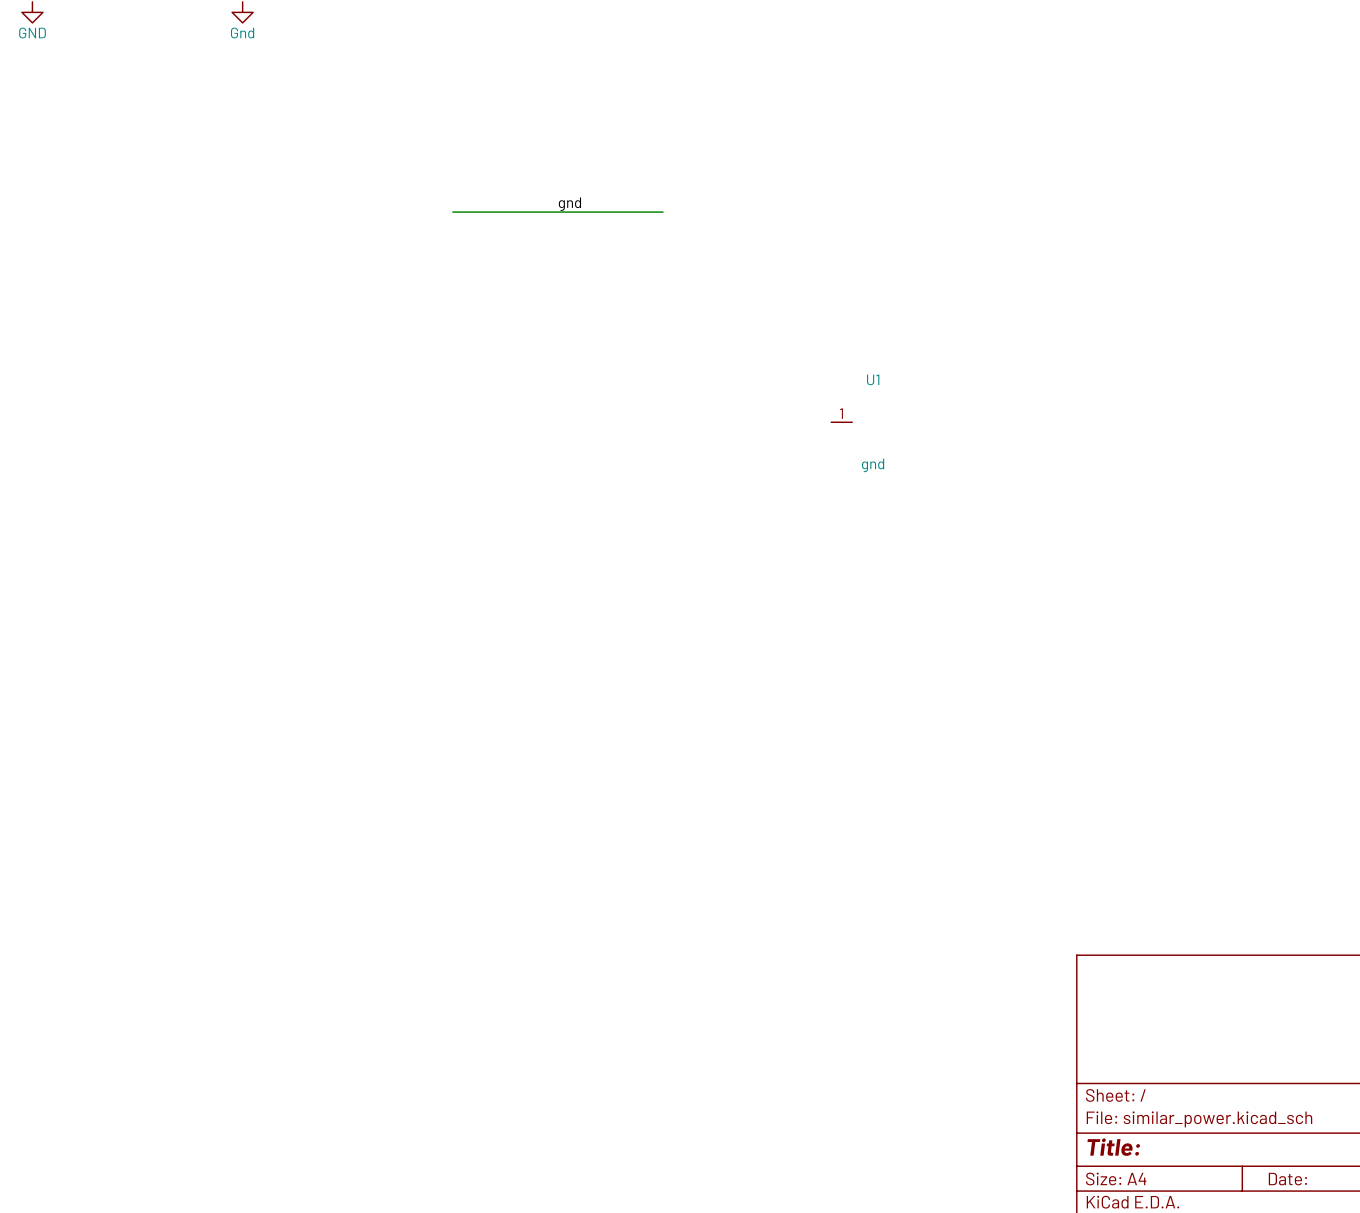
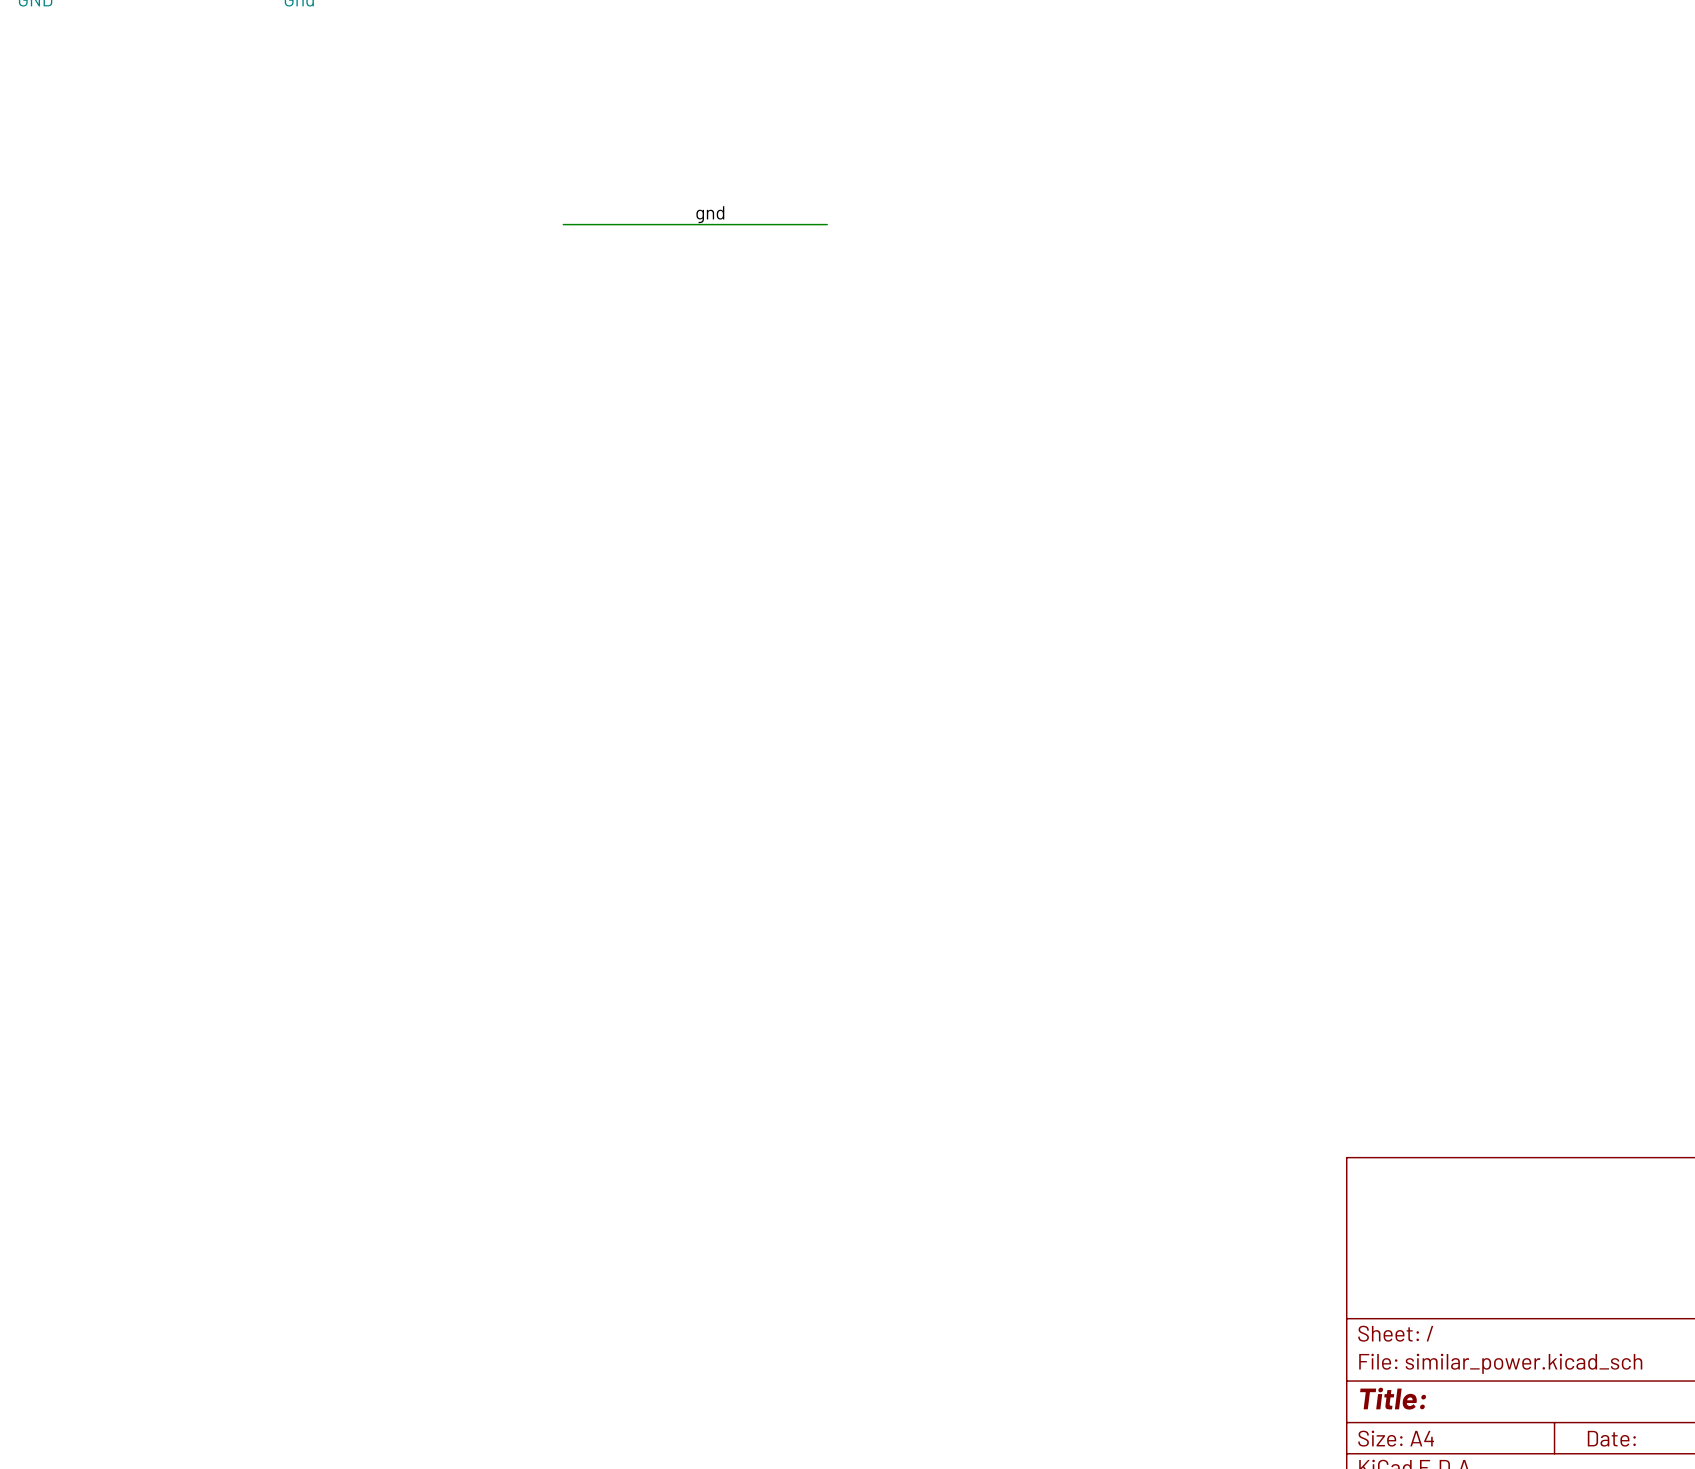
U1: gnd (841, 422) -> none

